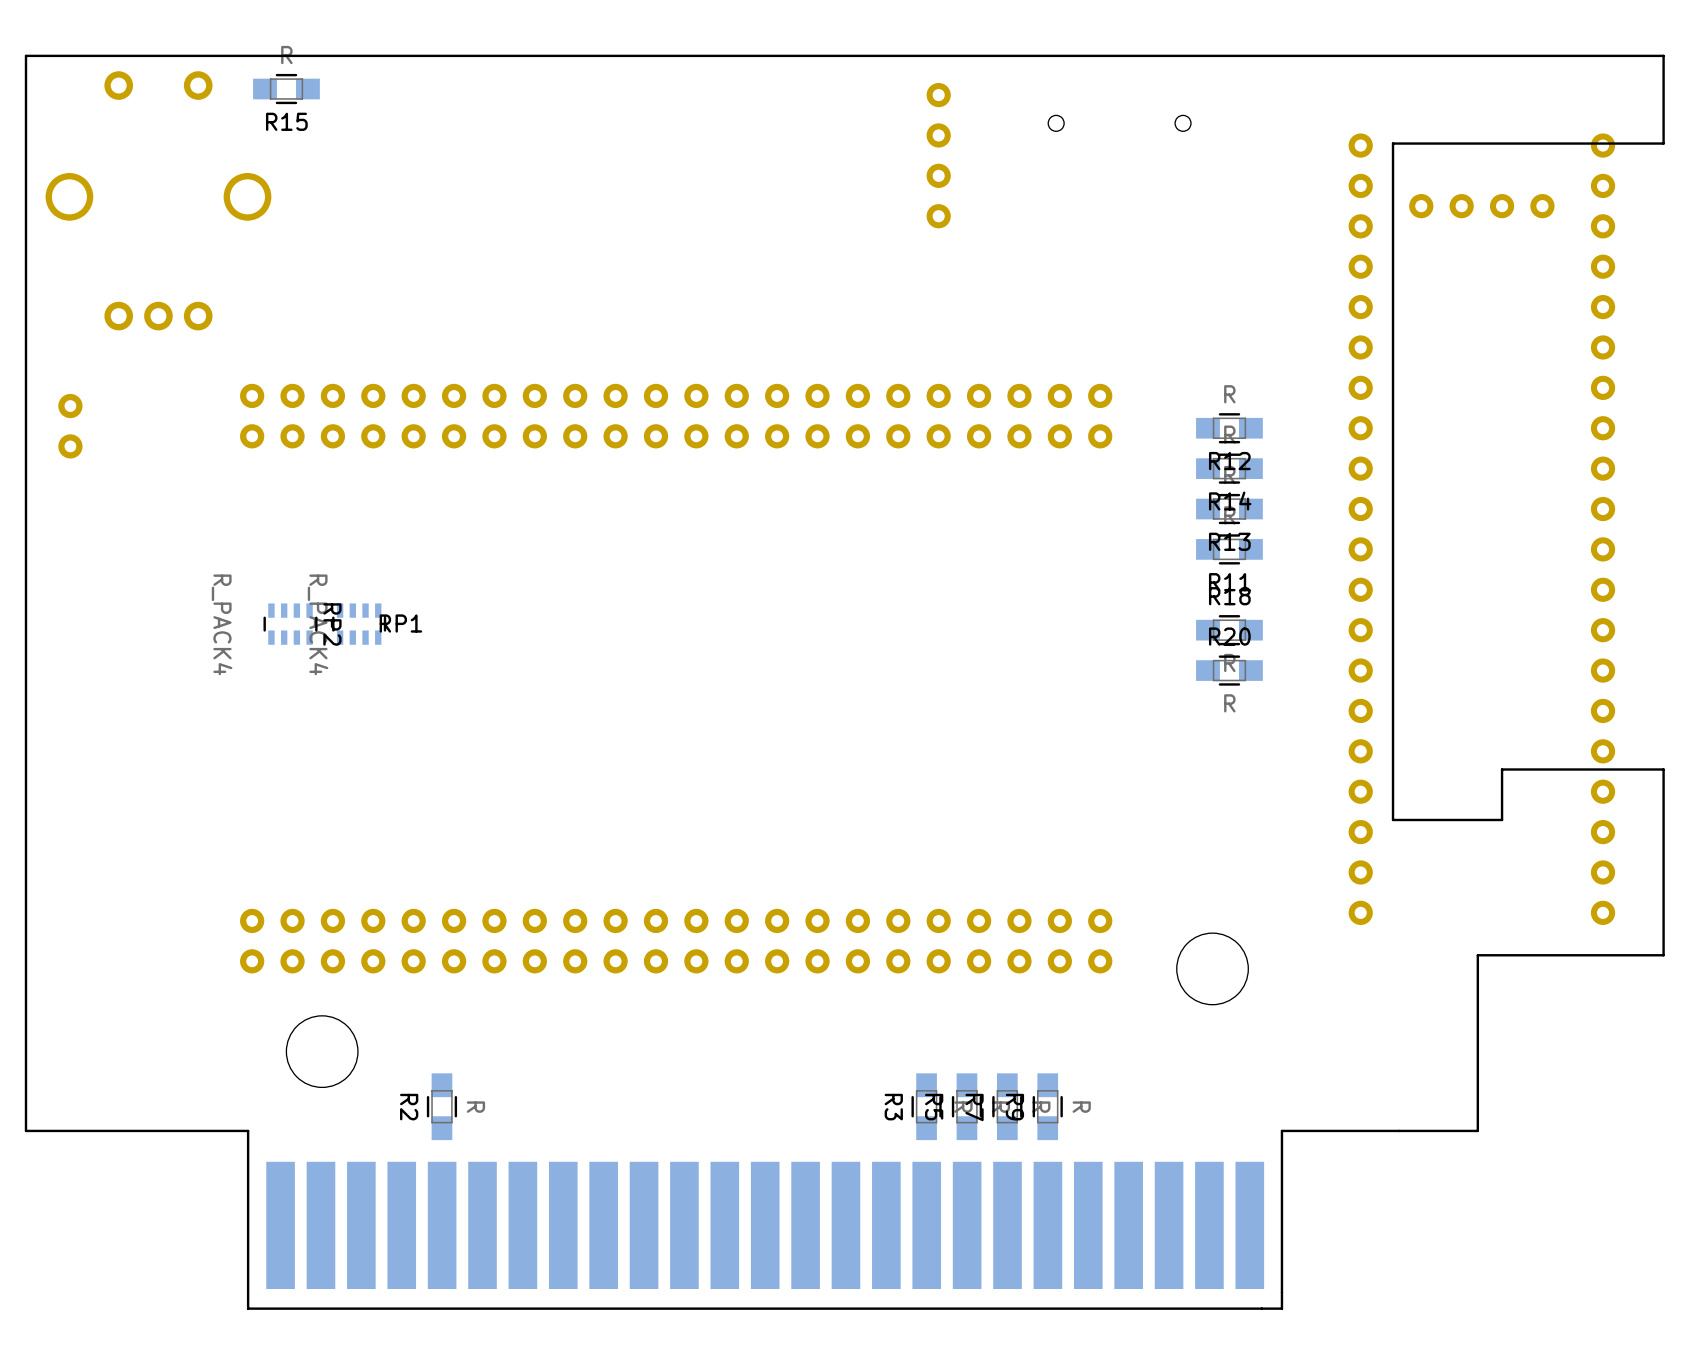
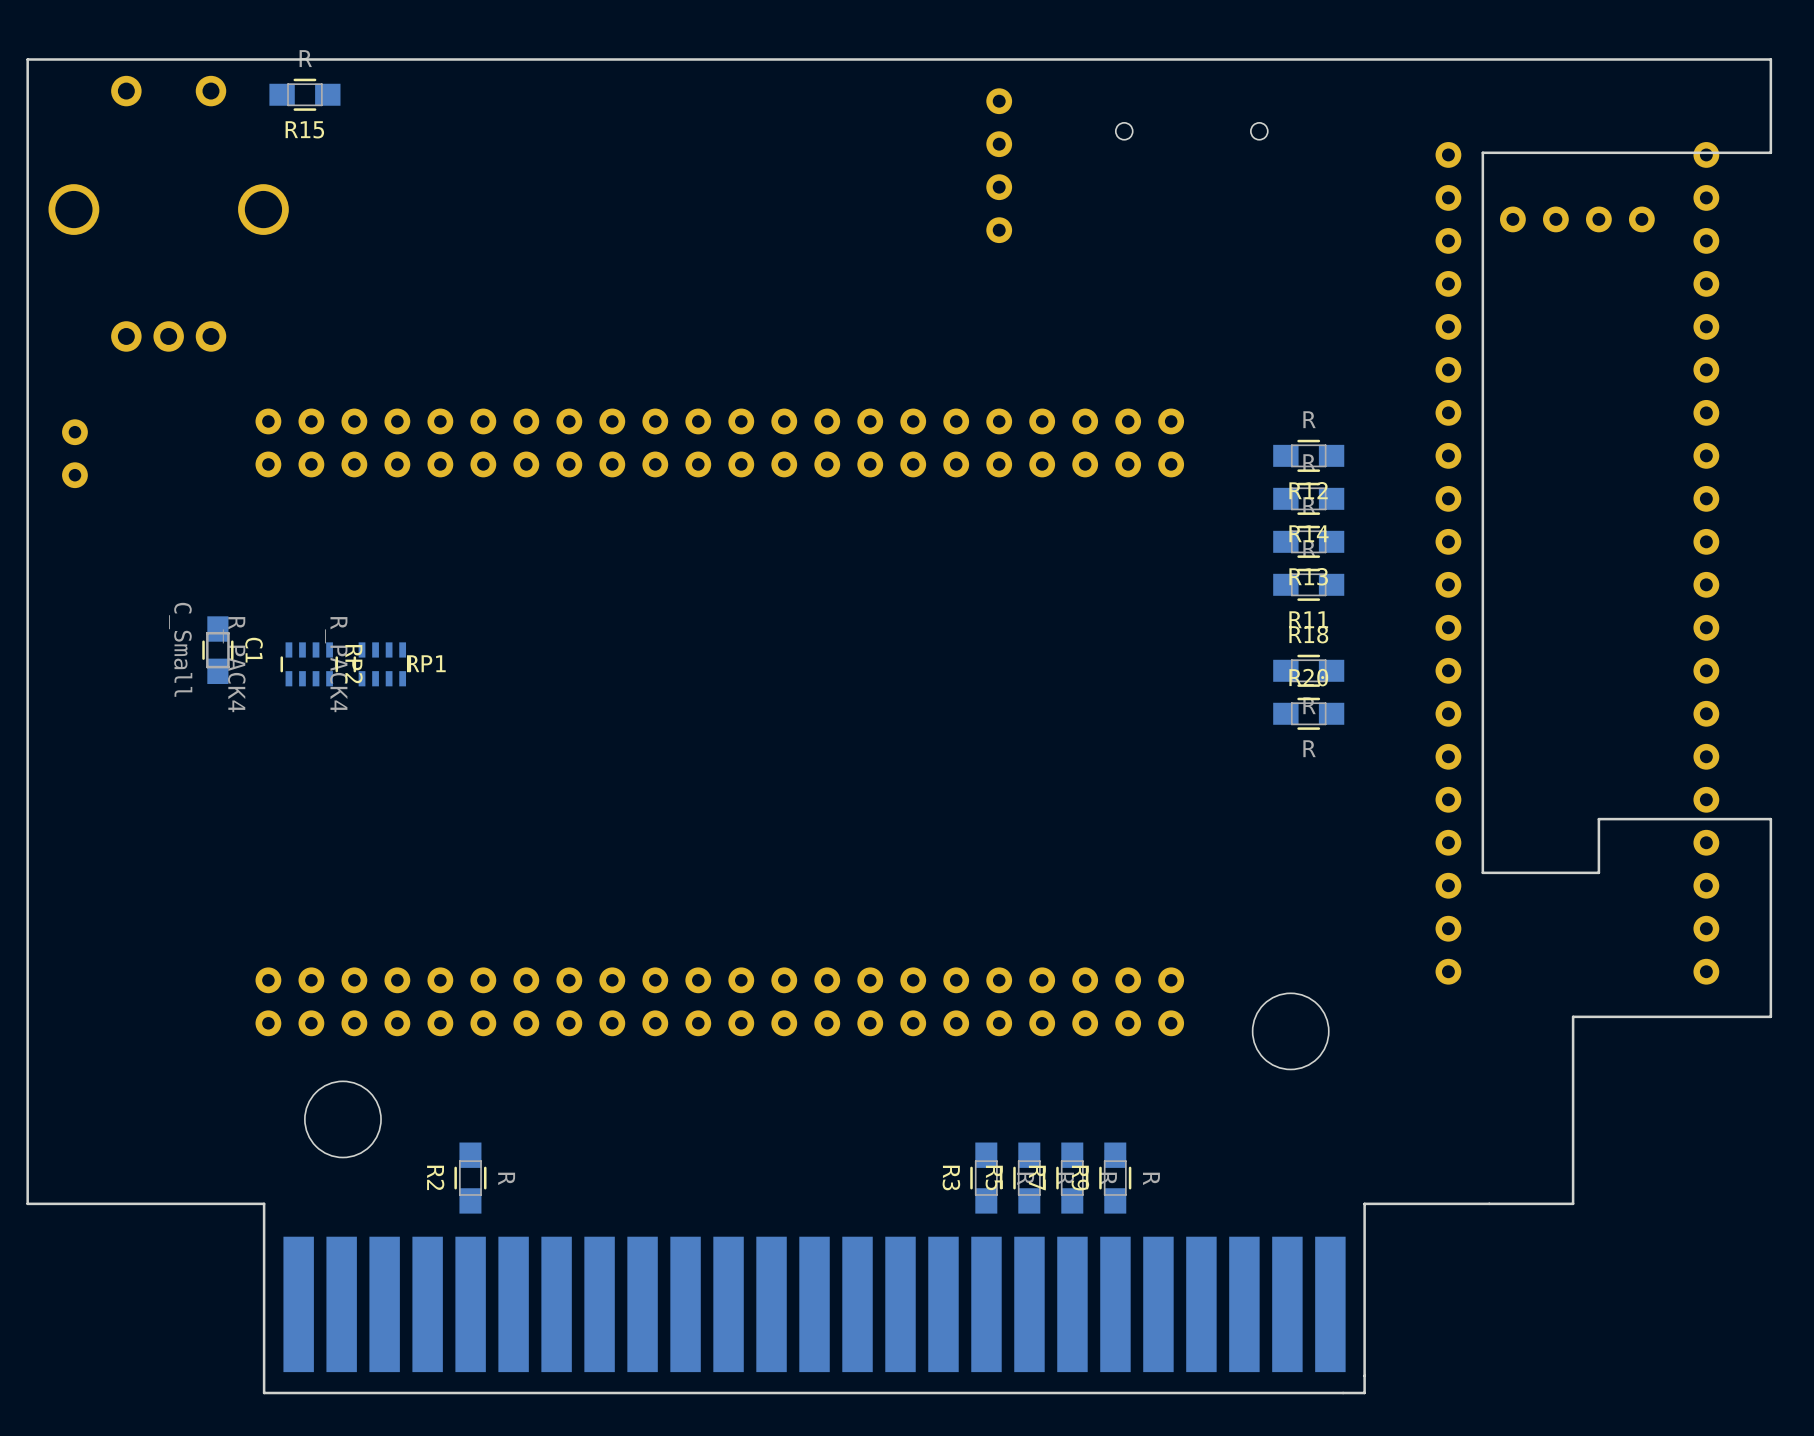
C1: none -> C_Small (217, 650)

